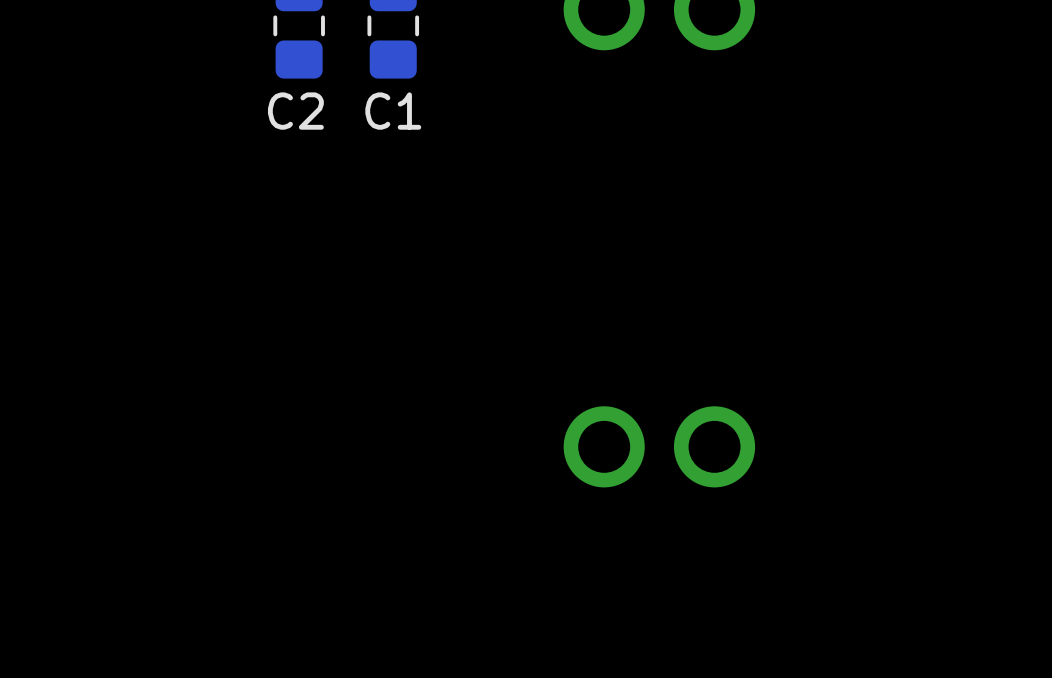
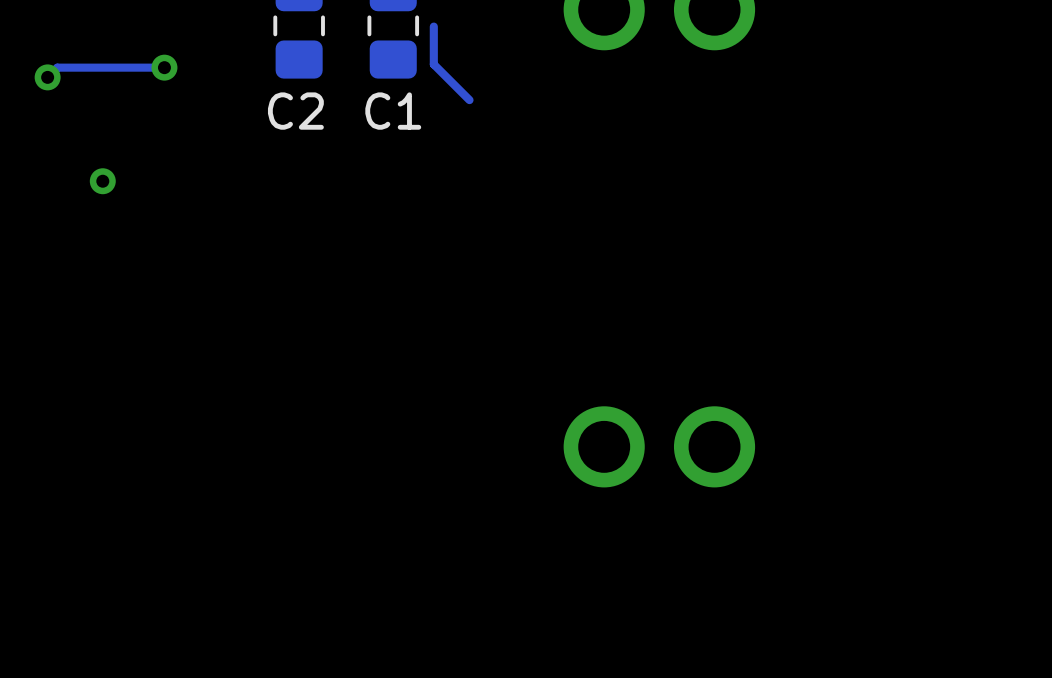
track: none -> (433, 26) (433, 64) (469, 100)
track: none -> (164, 67) (57, 67) (47, 77)
via: none -> (164, 67)
via: none -> (47, 77)
via: none -> (102, 181)

